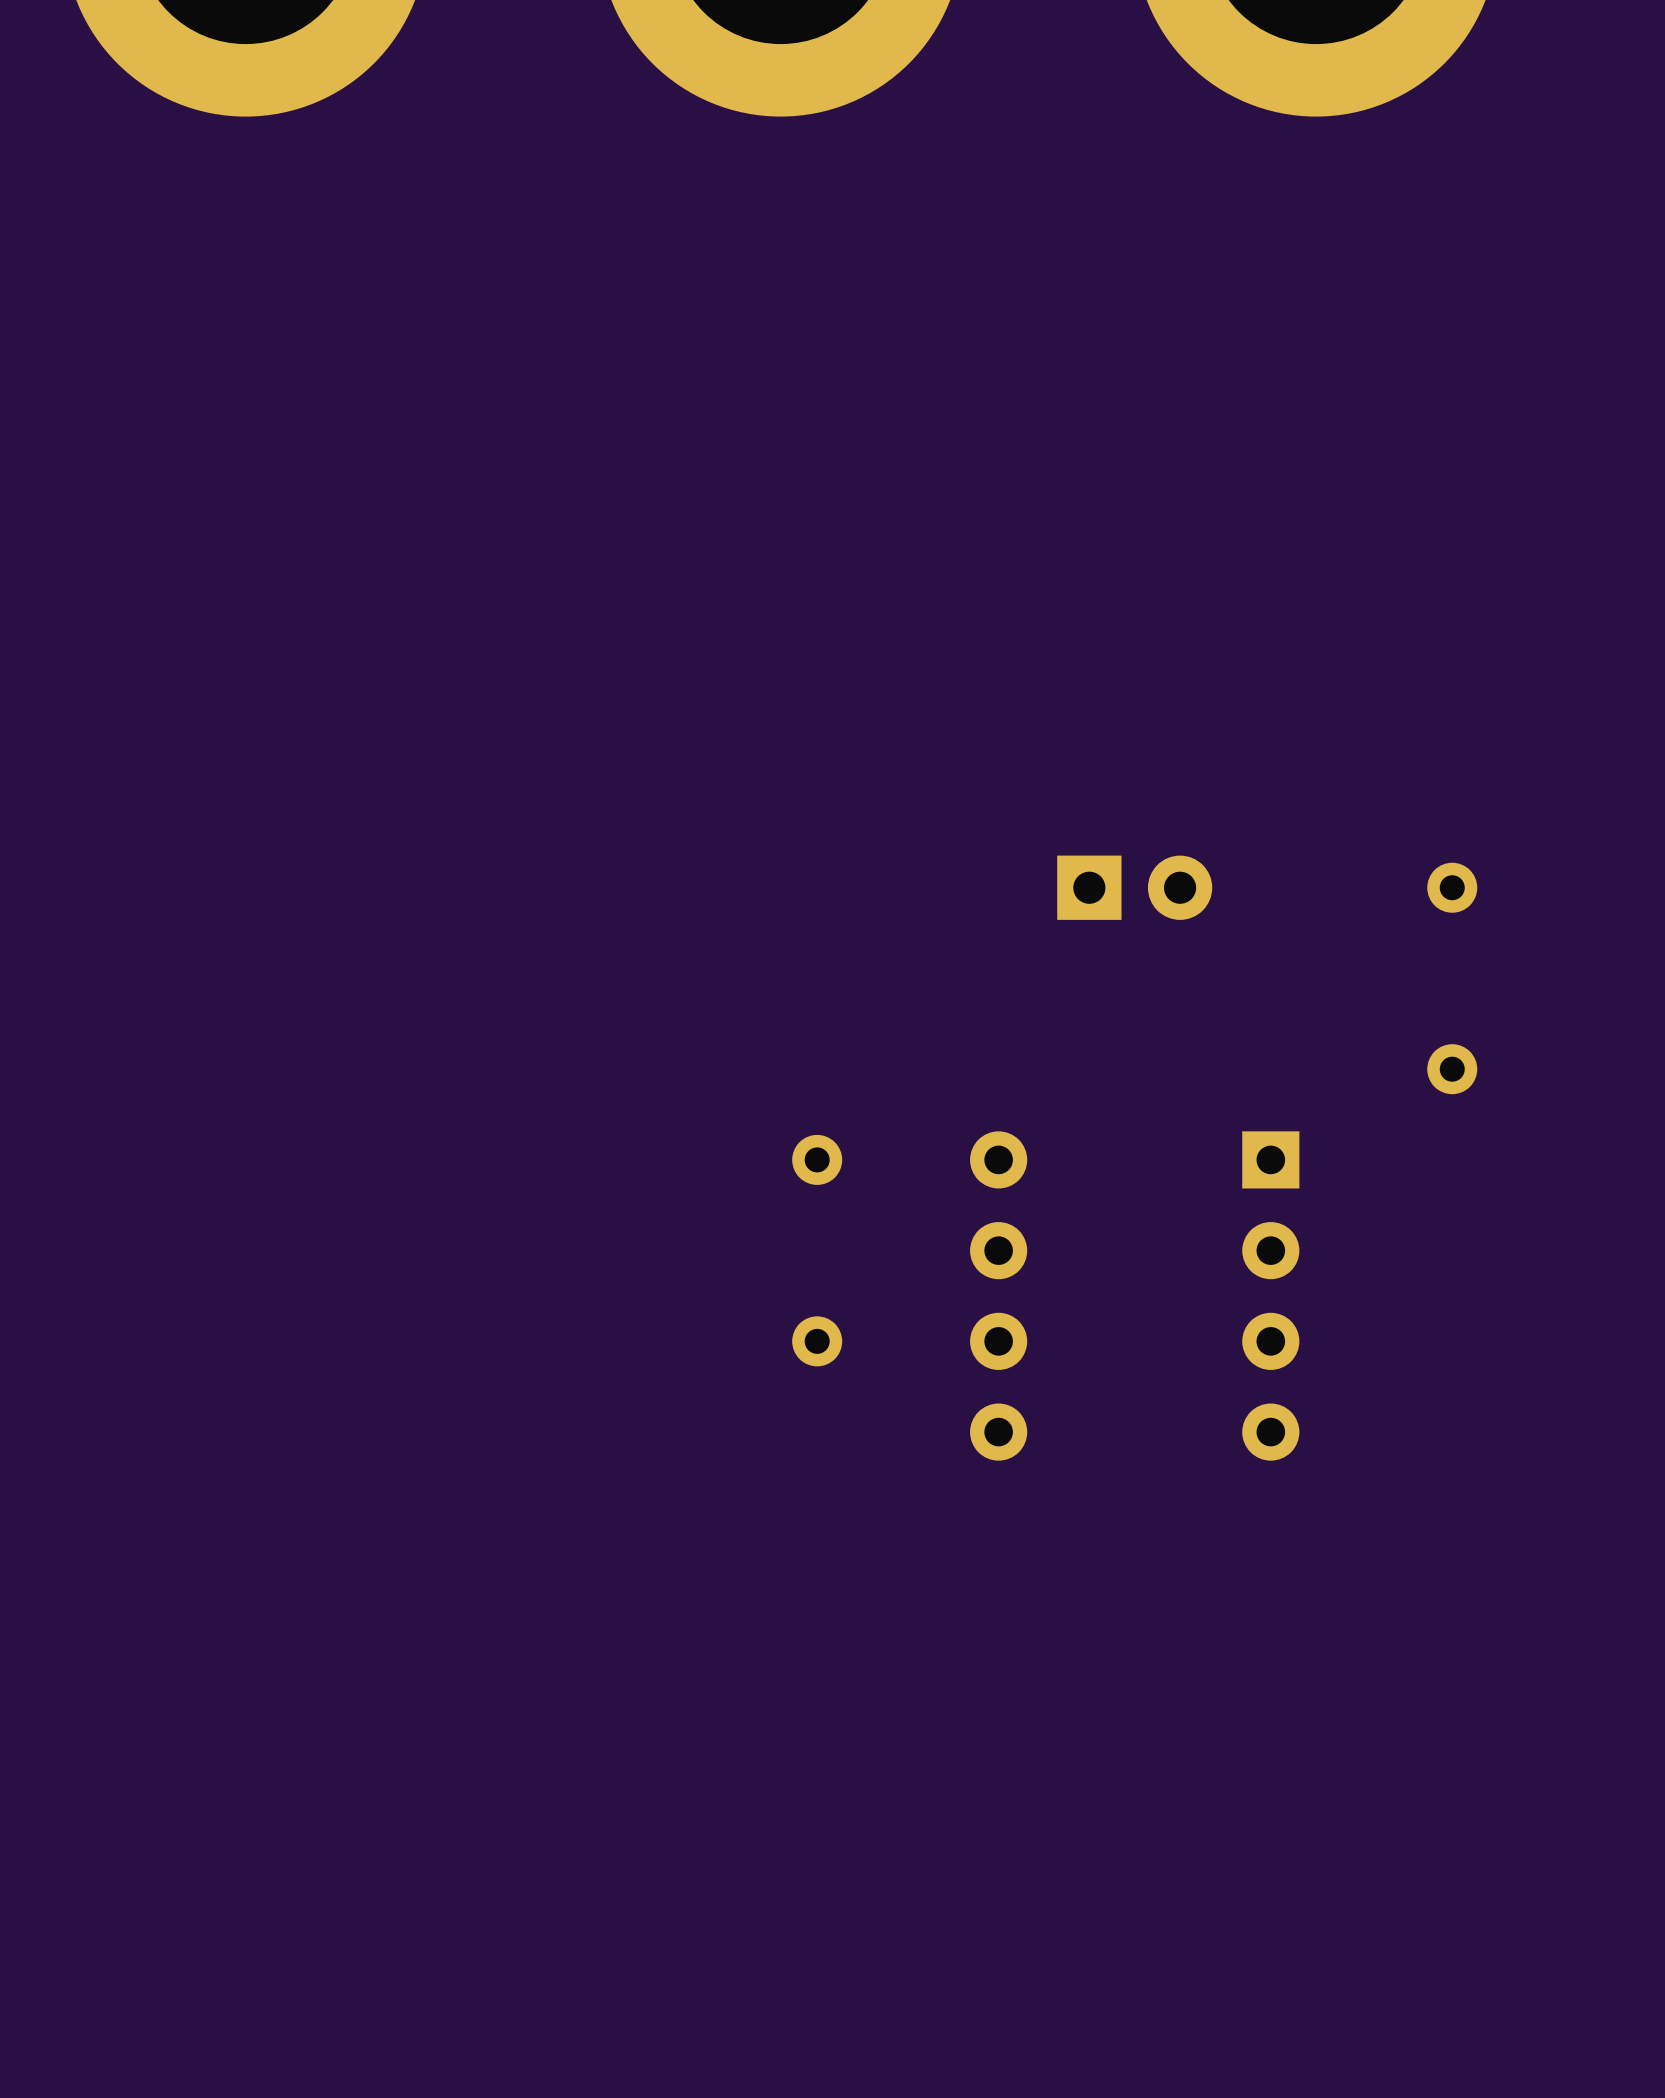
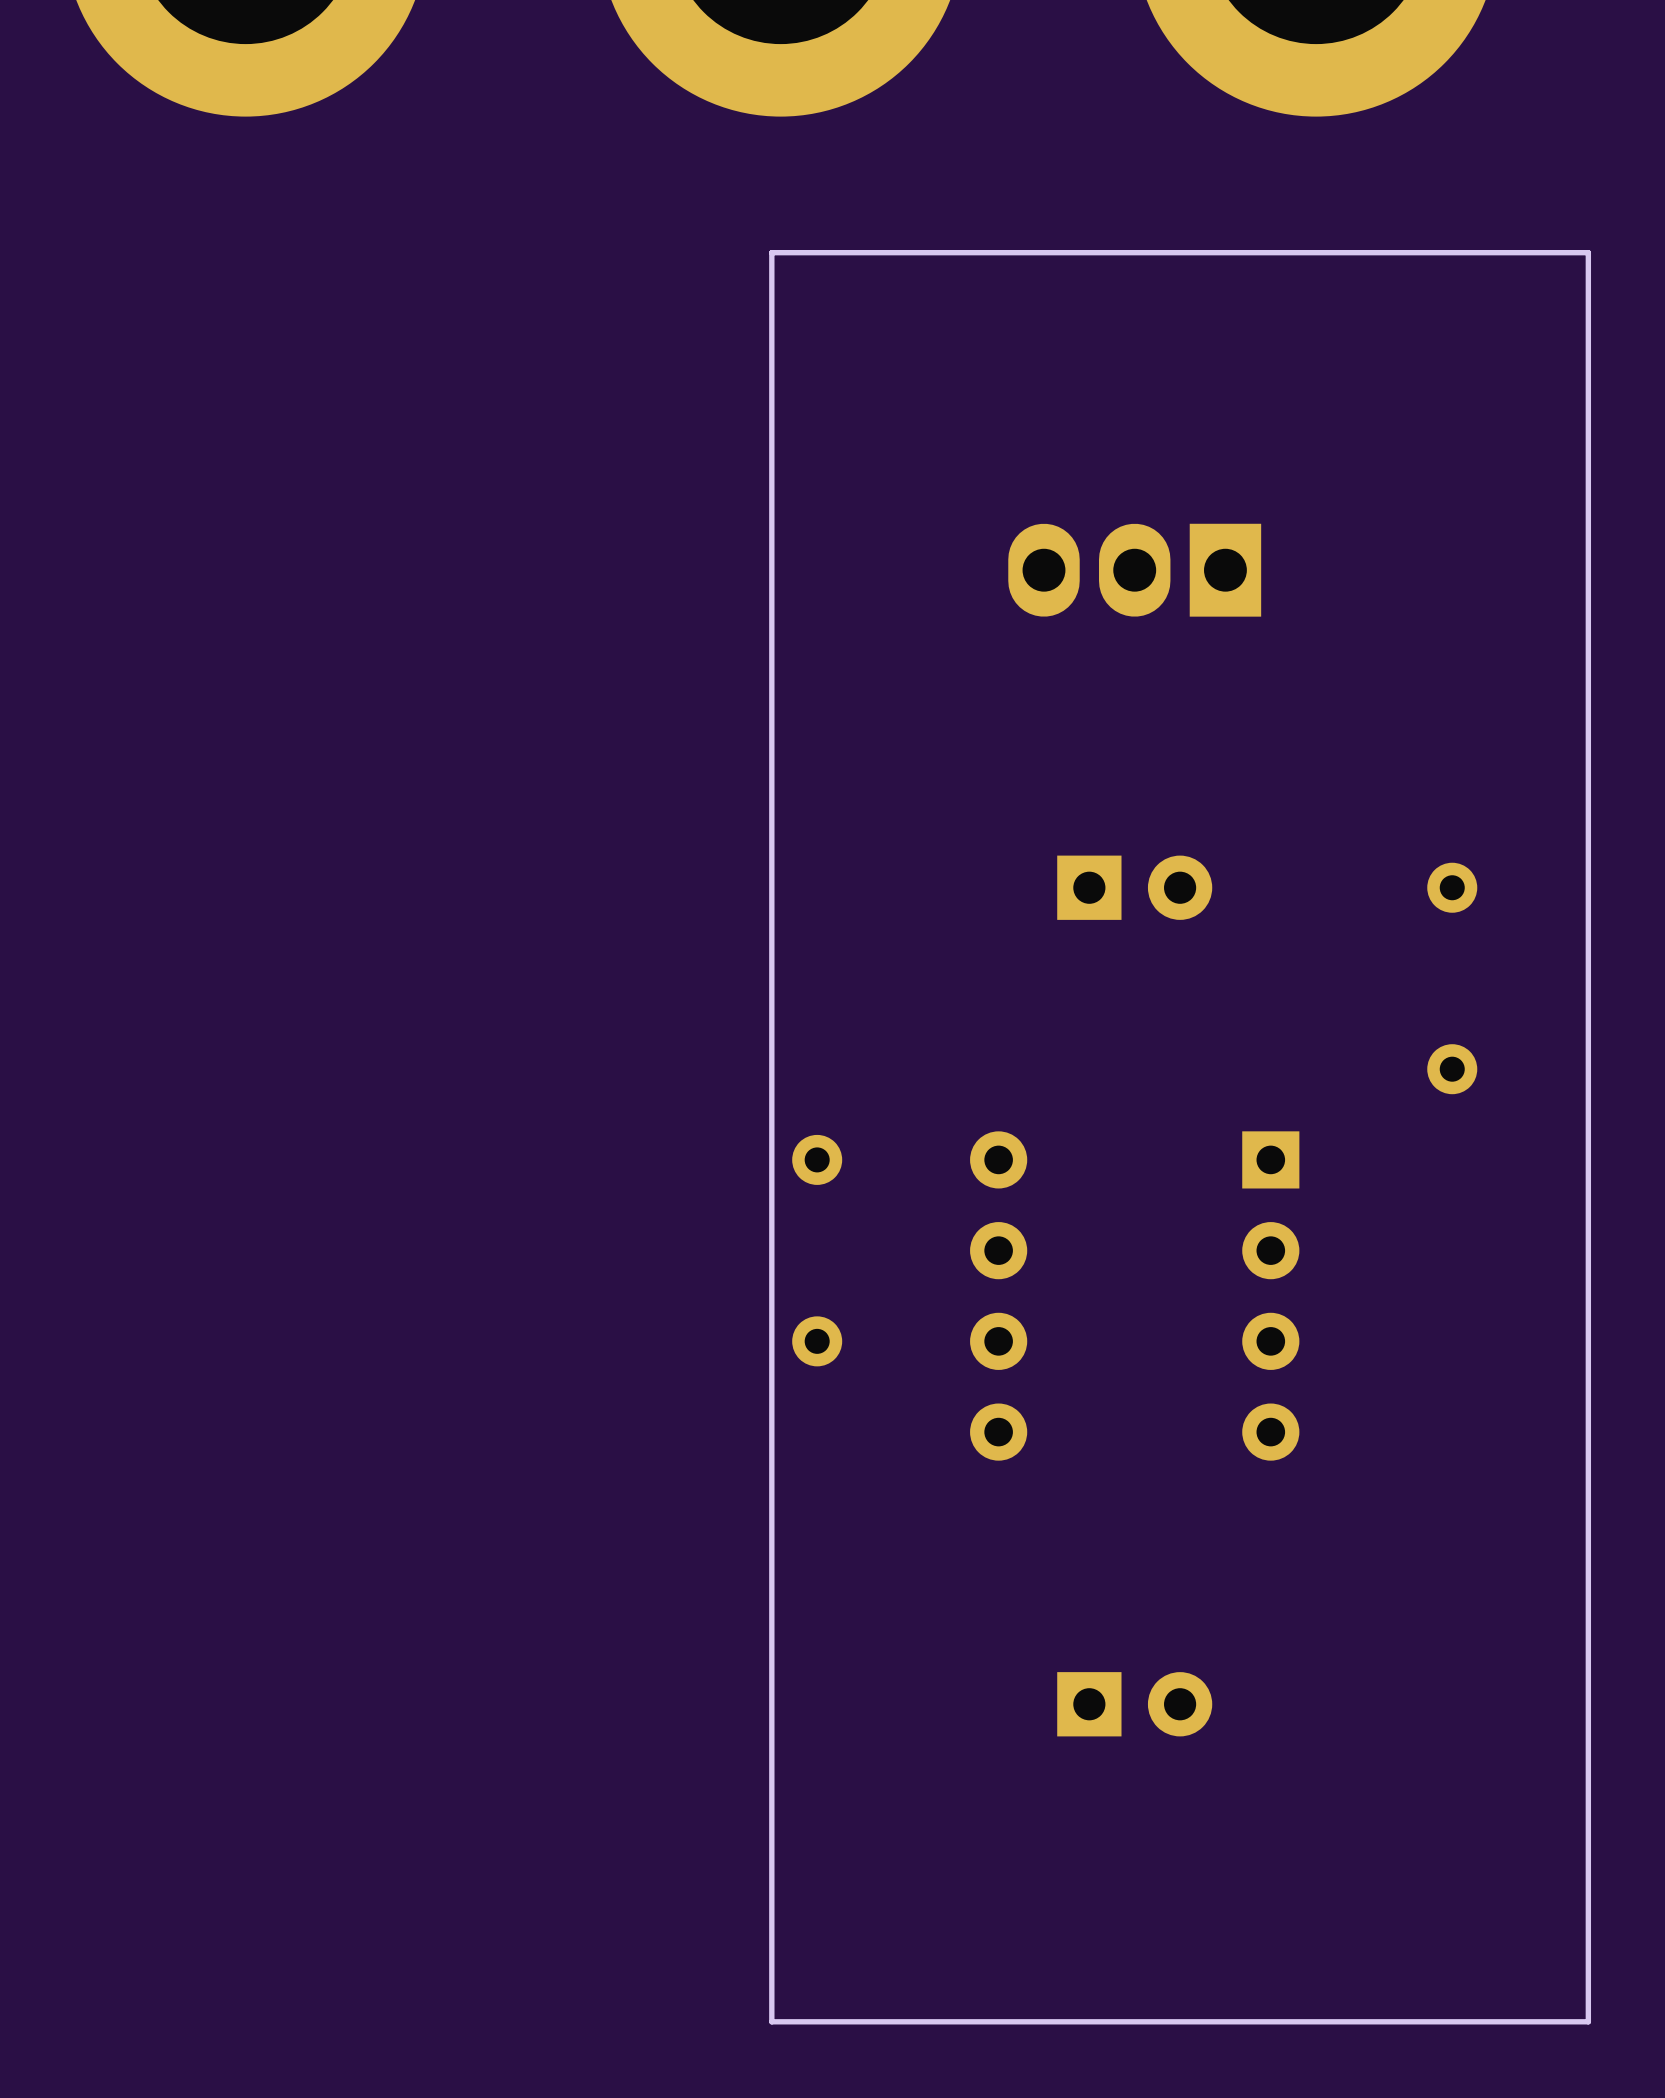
board edge: none -> (1588, 252) (771, 252) (771, 2021) (1588, 2021) (1588, 252)
part: none -> (1134, 570)
part: none -> (1134, 1704)

